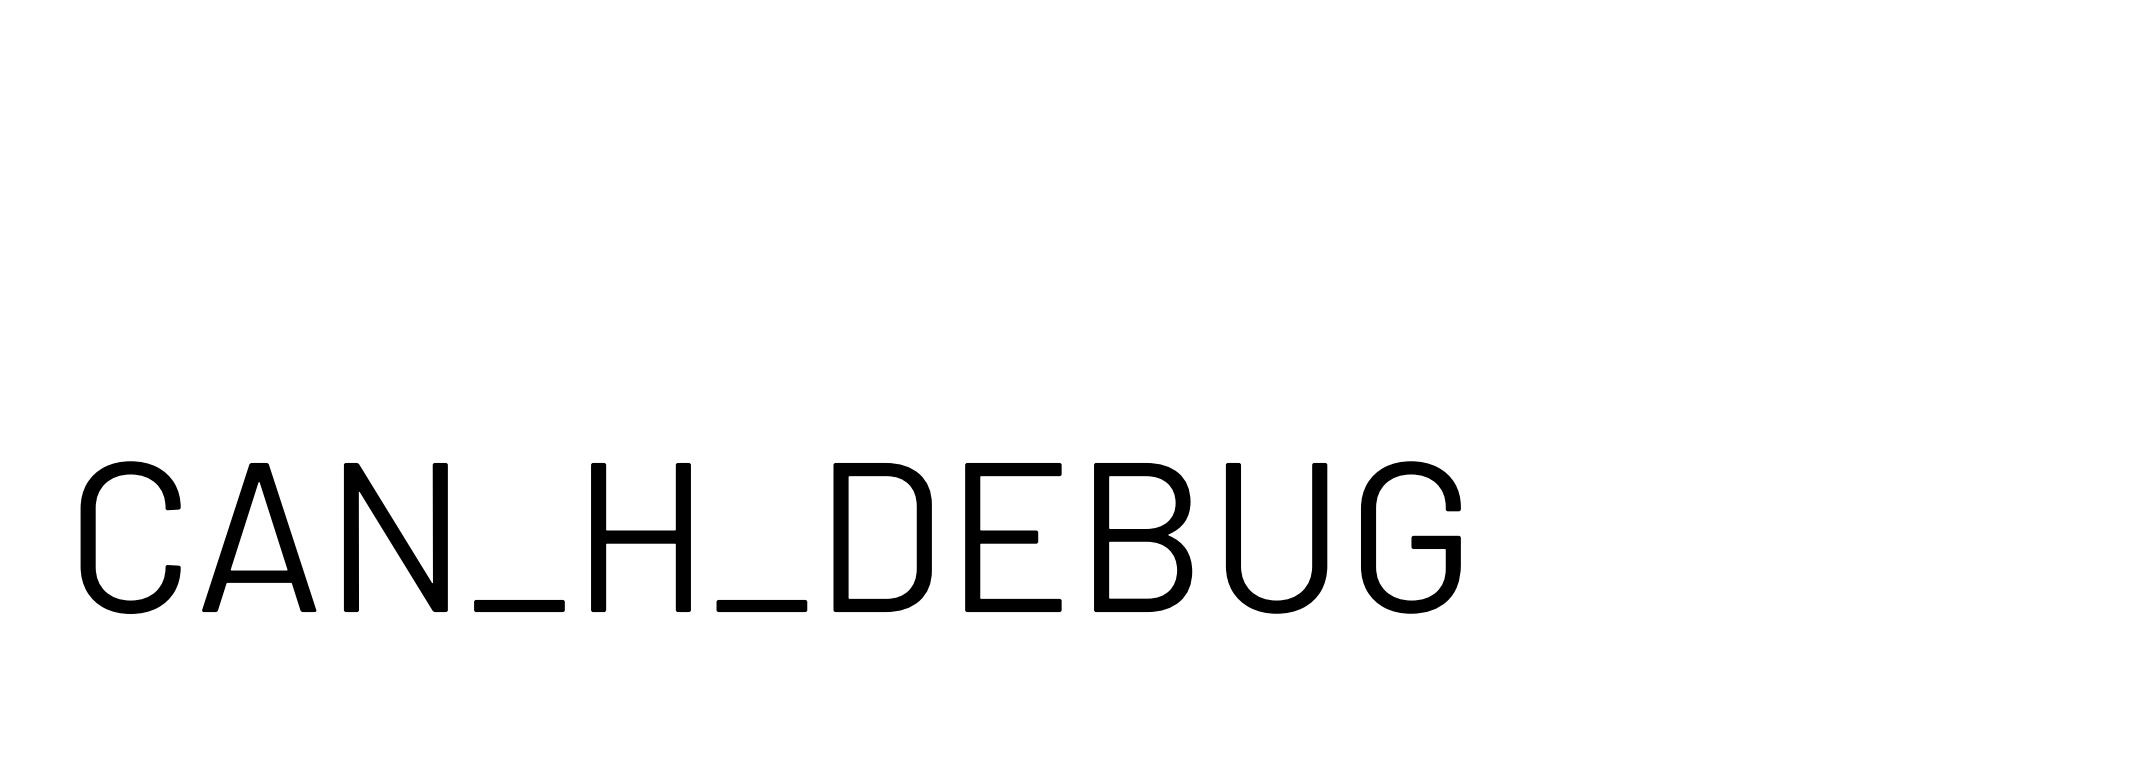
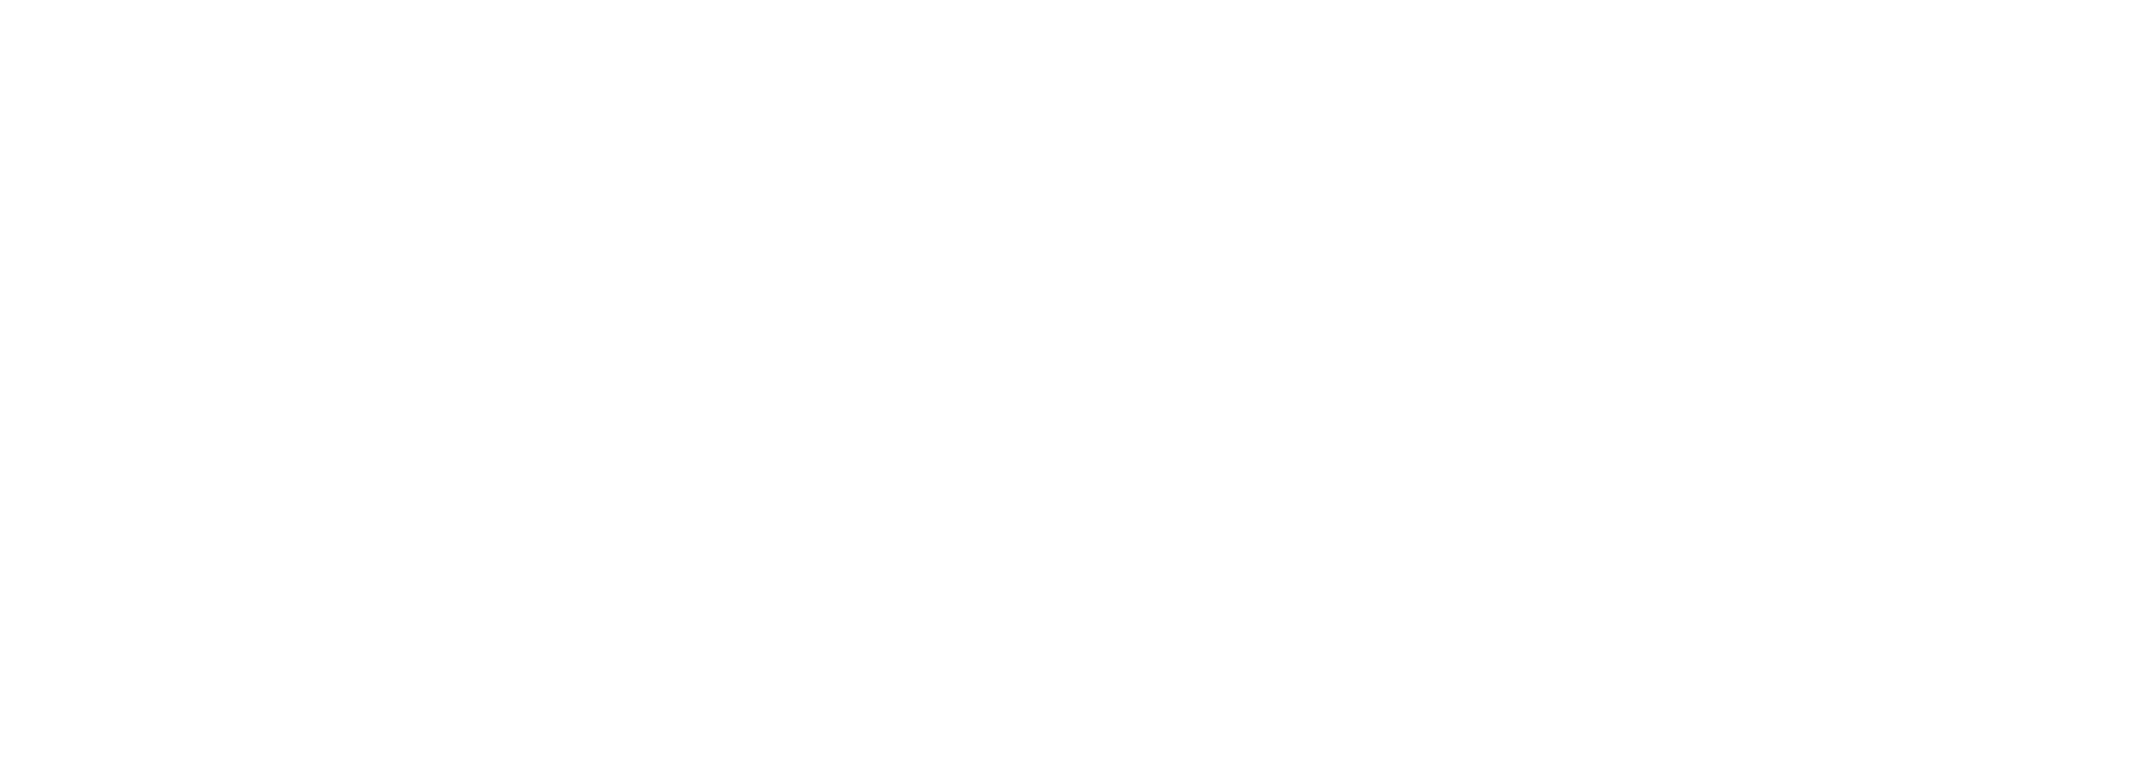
label: CAN_H_DEBUG (770, 537) -> none

